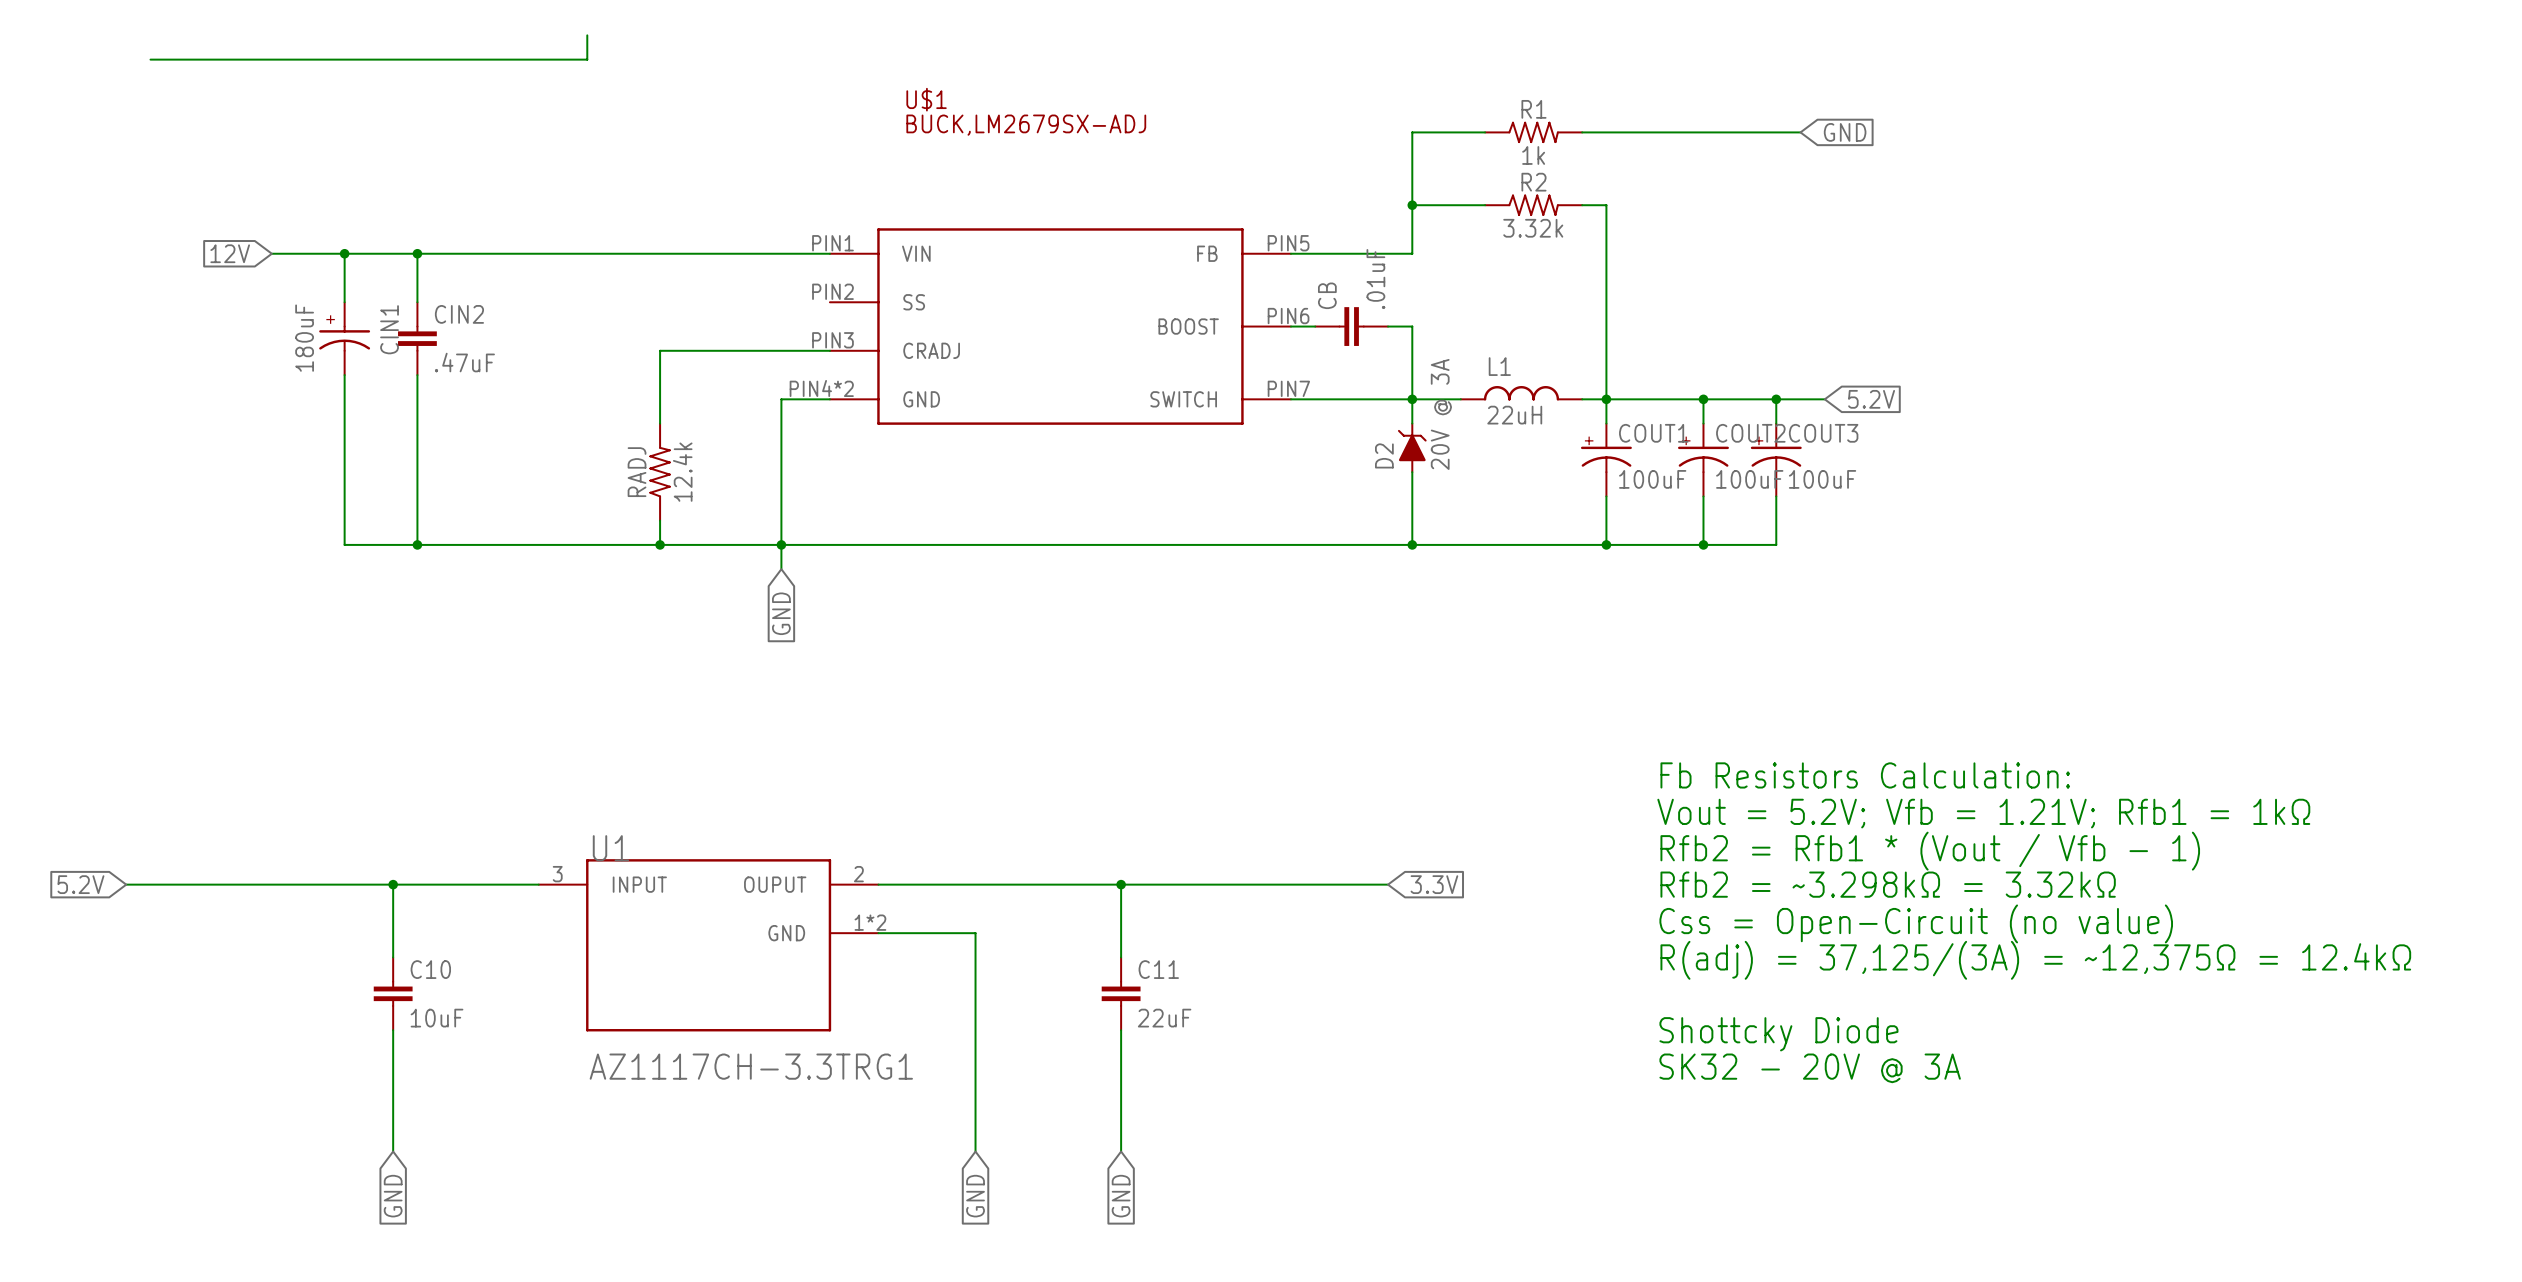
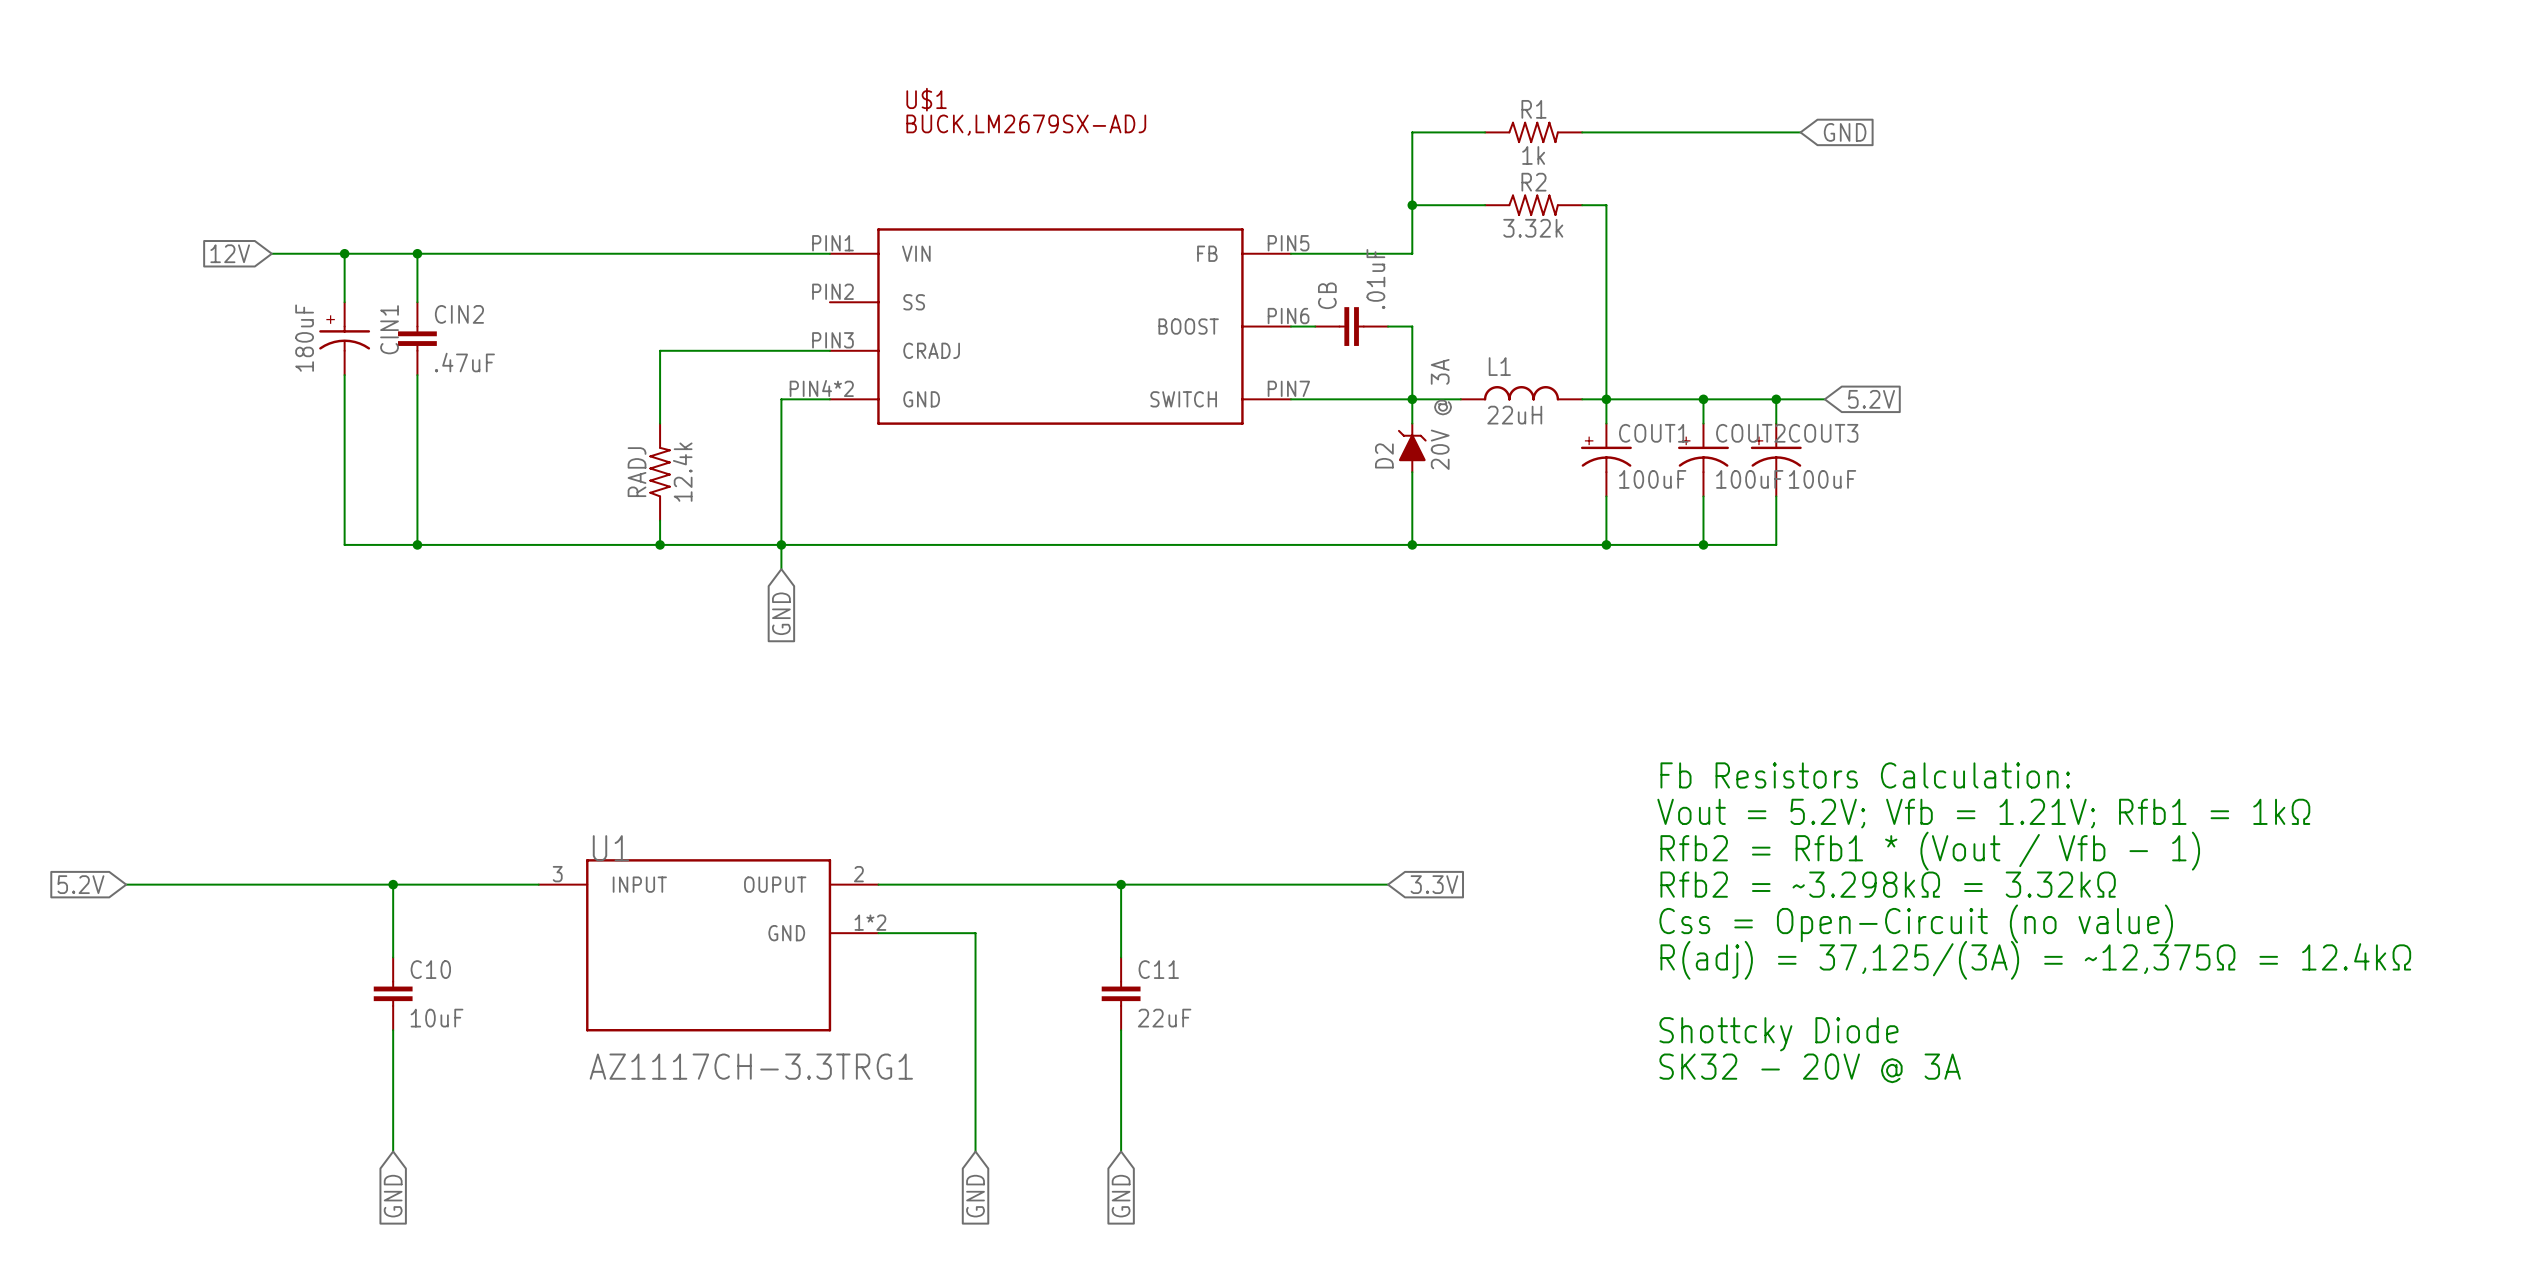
wire: (587, 35) (587, 59) (150, 59) -> none

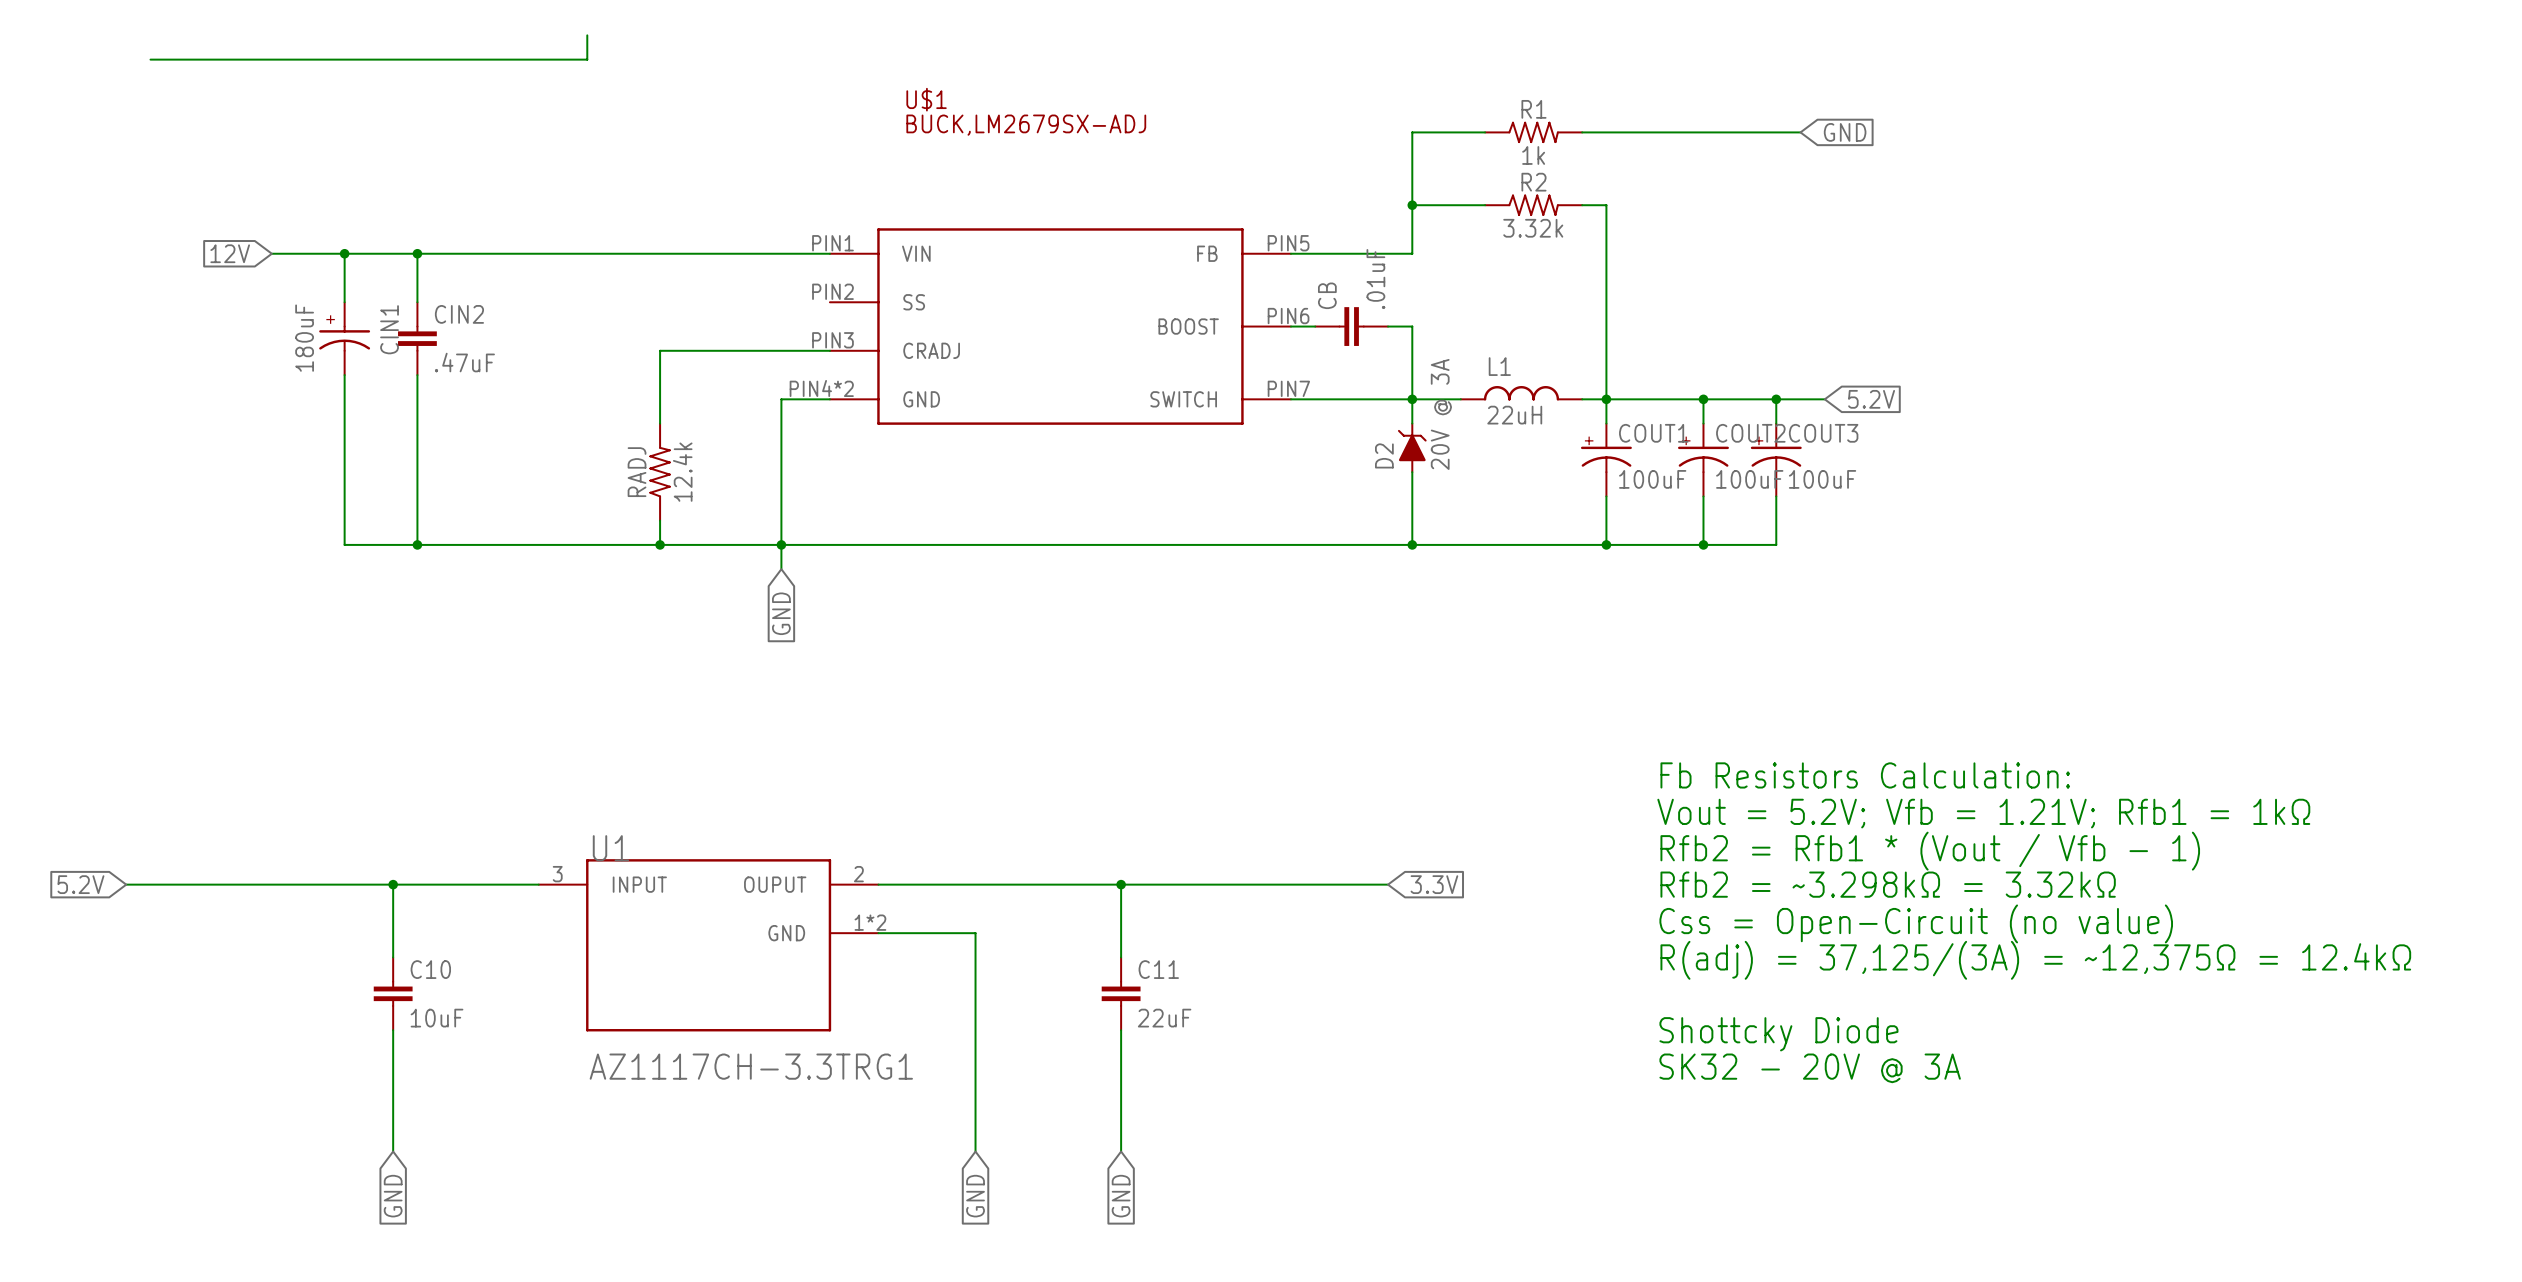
wire: none -> (587, 35) (587, 59) (150, 59)

